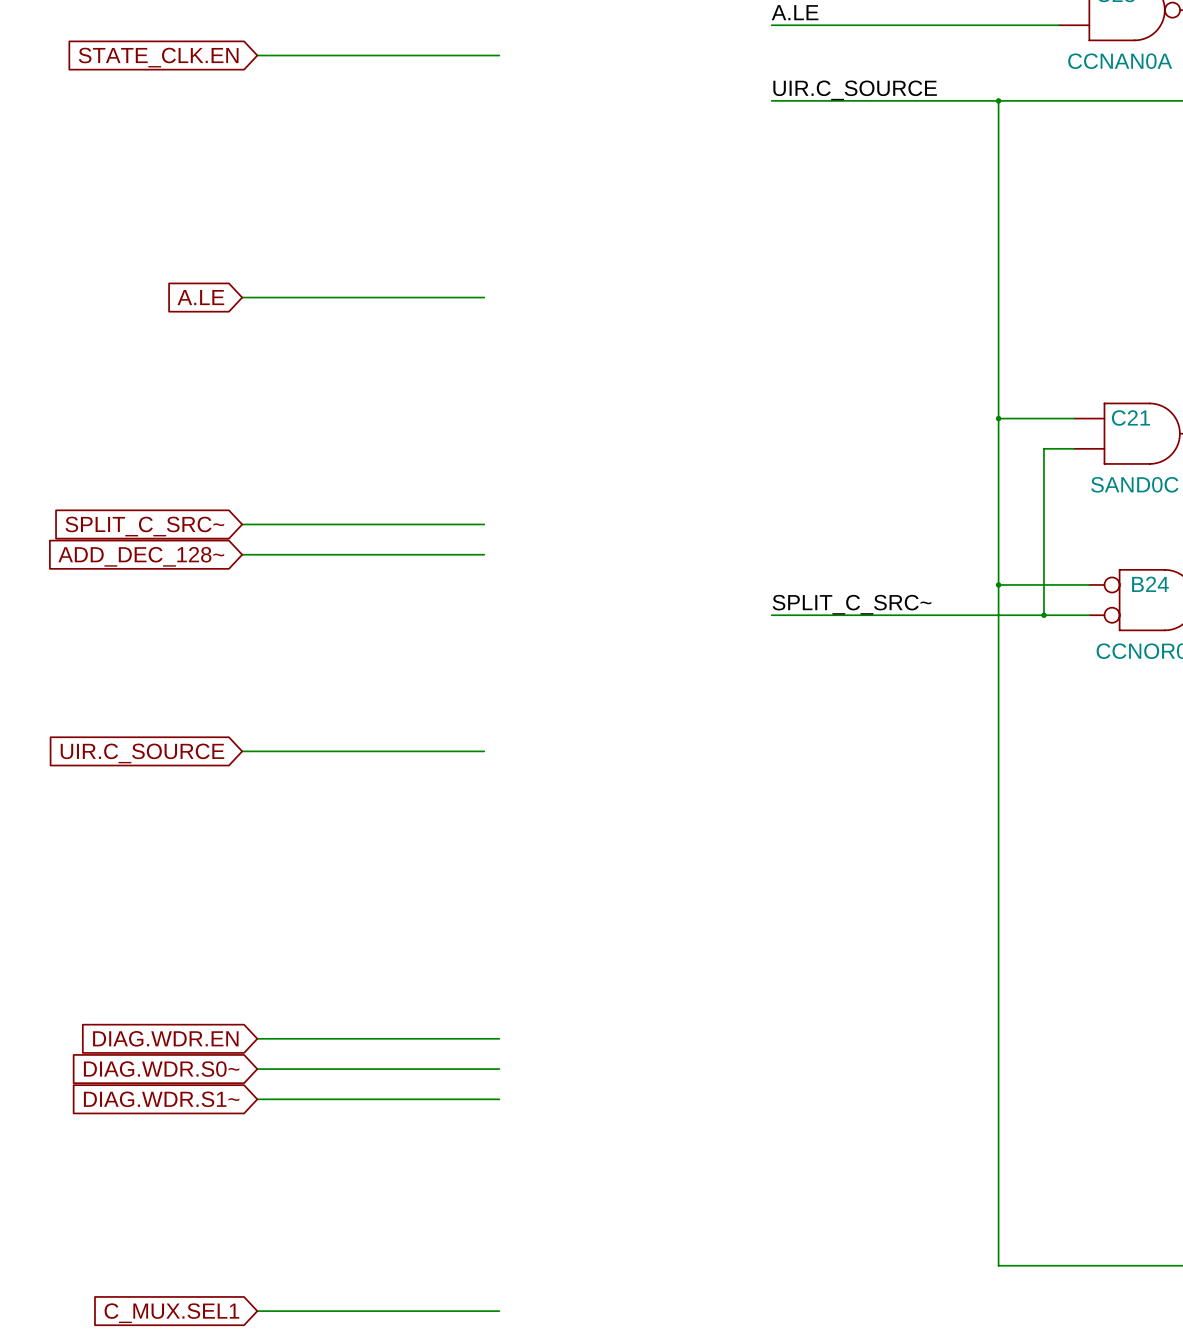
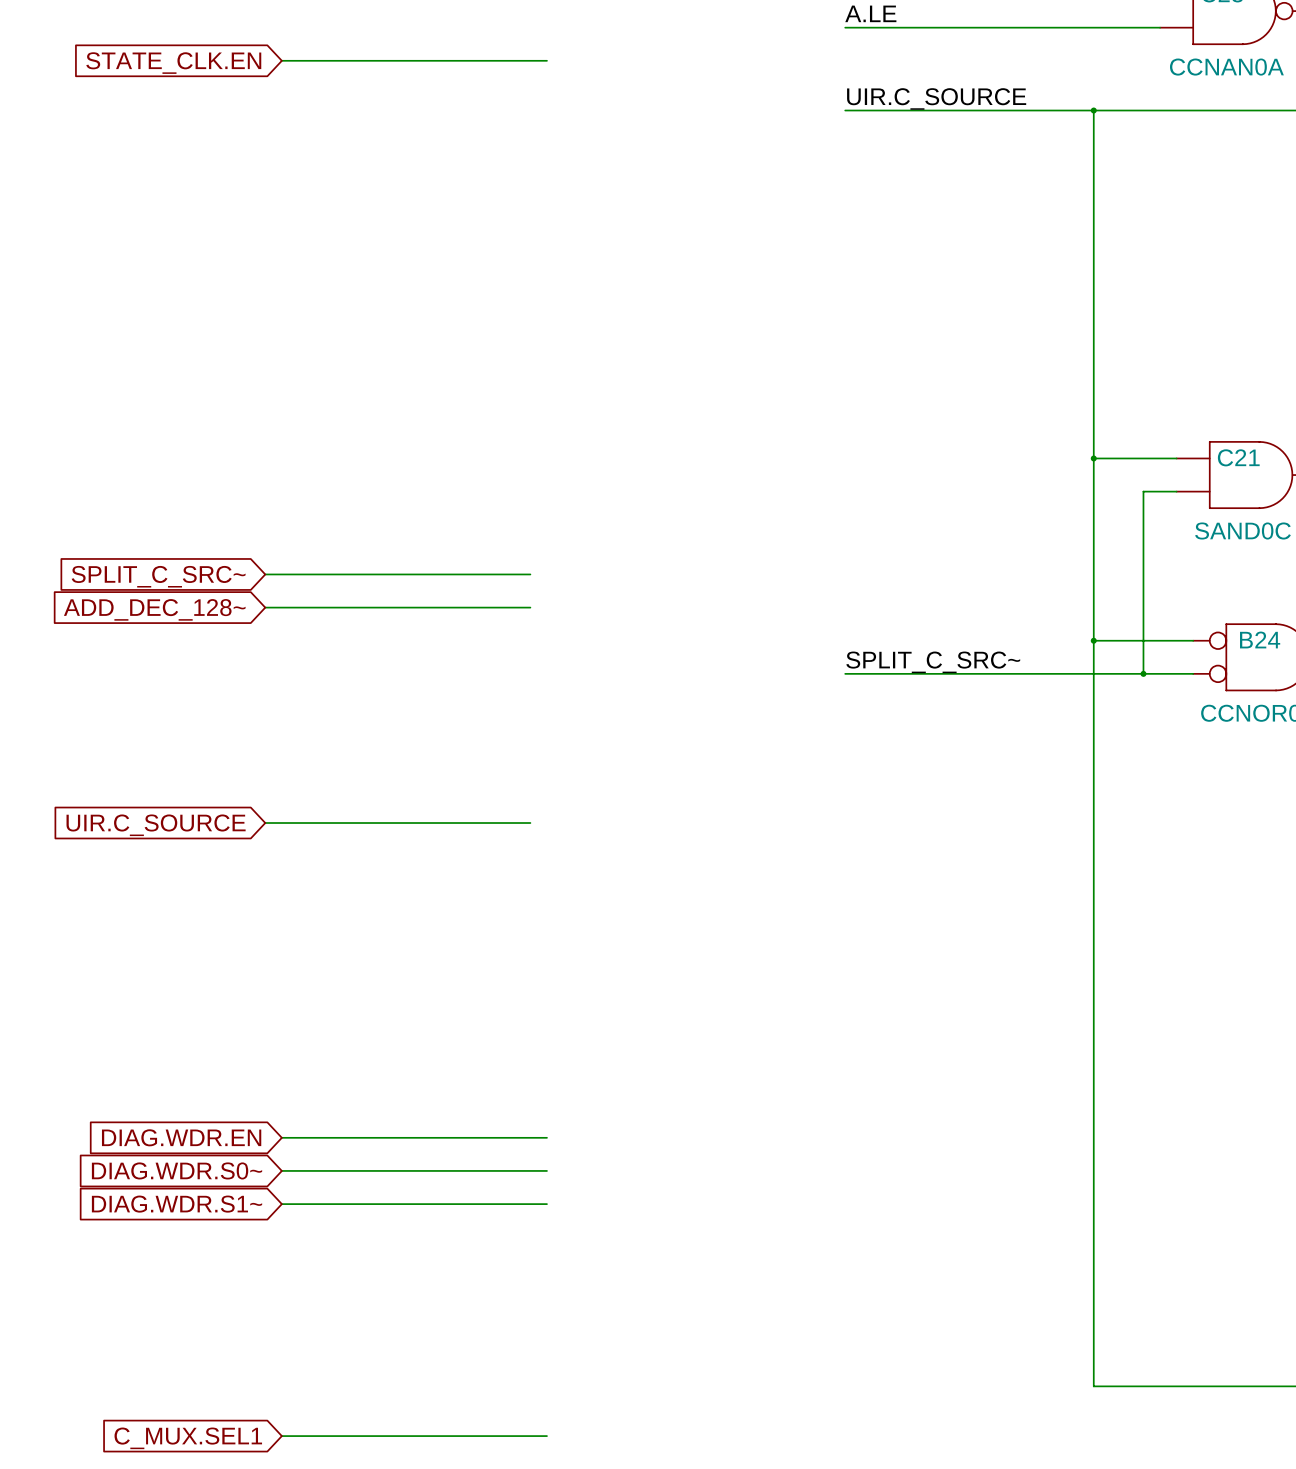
global label: A.LE (200, 297) -> none
wire: (242, 297) (484, 297) -> none

